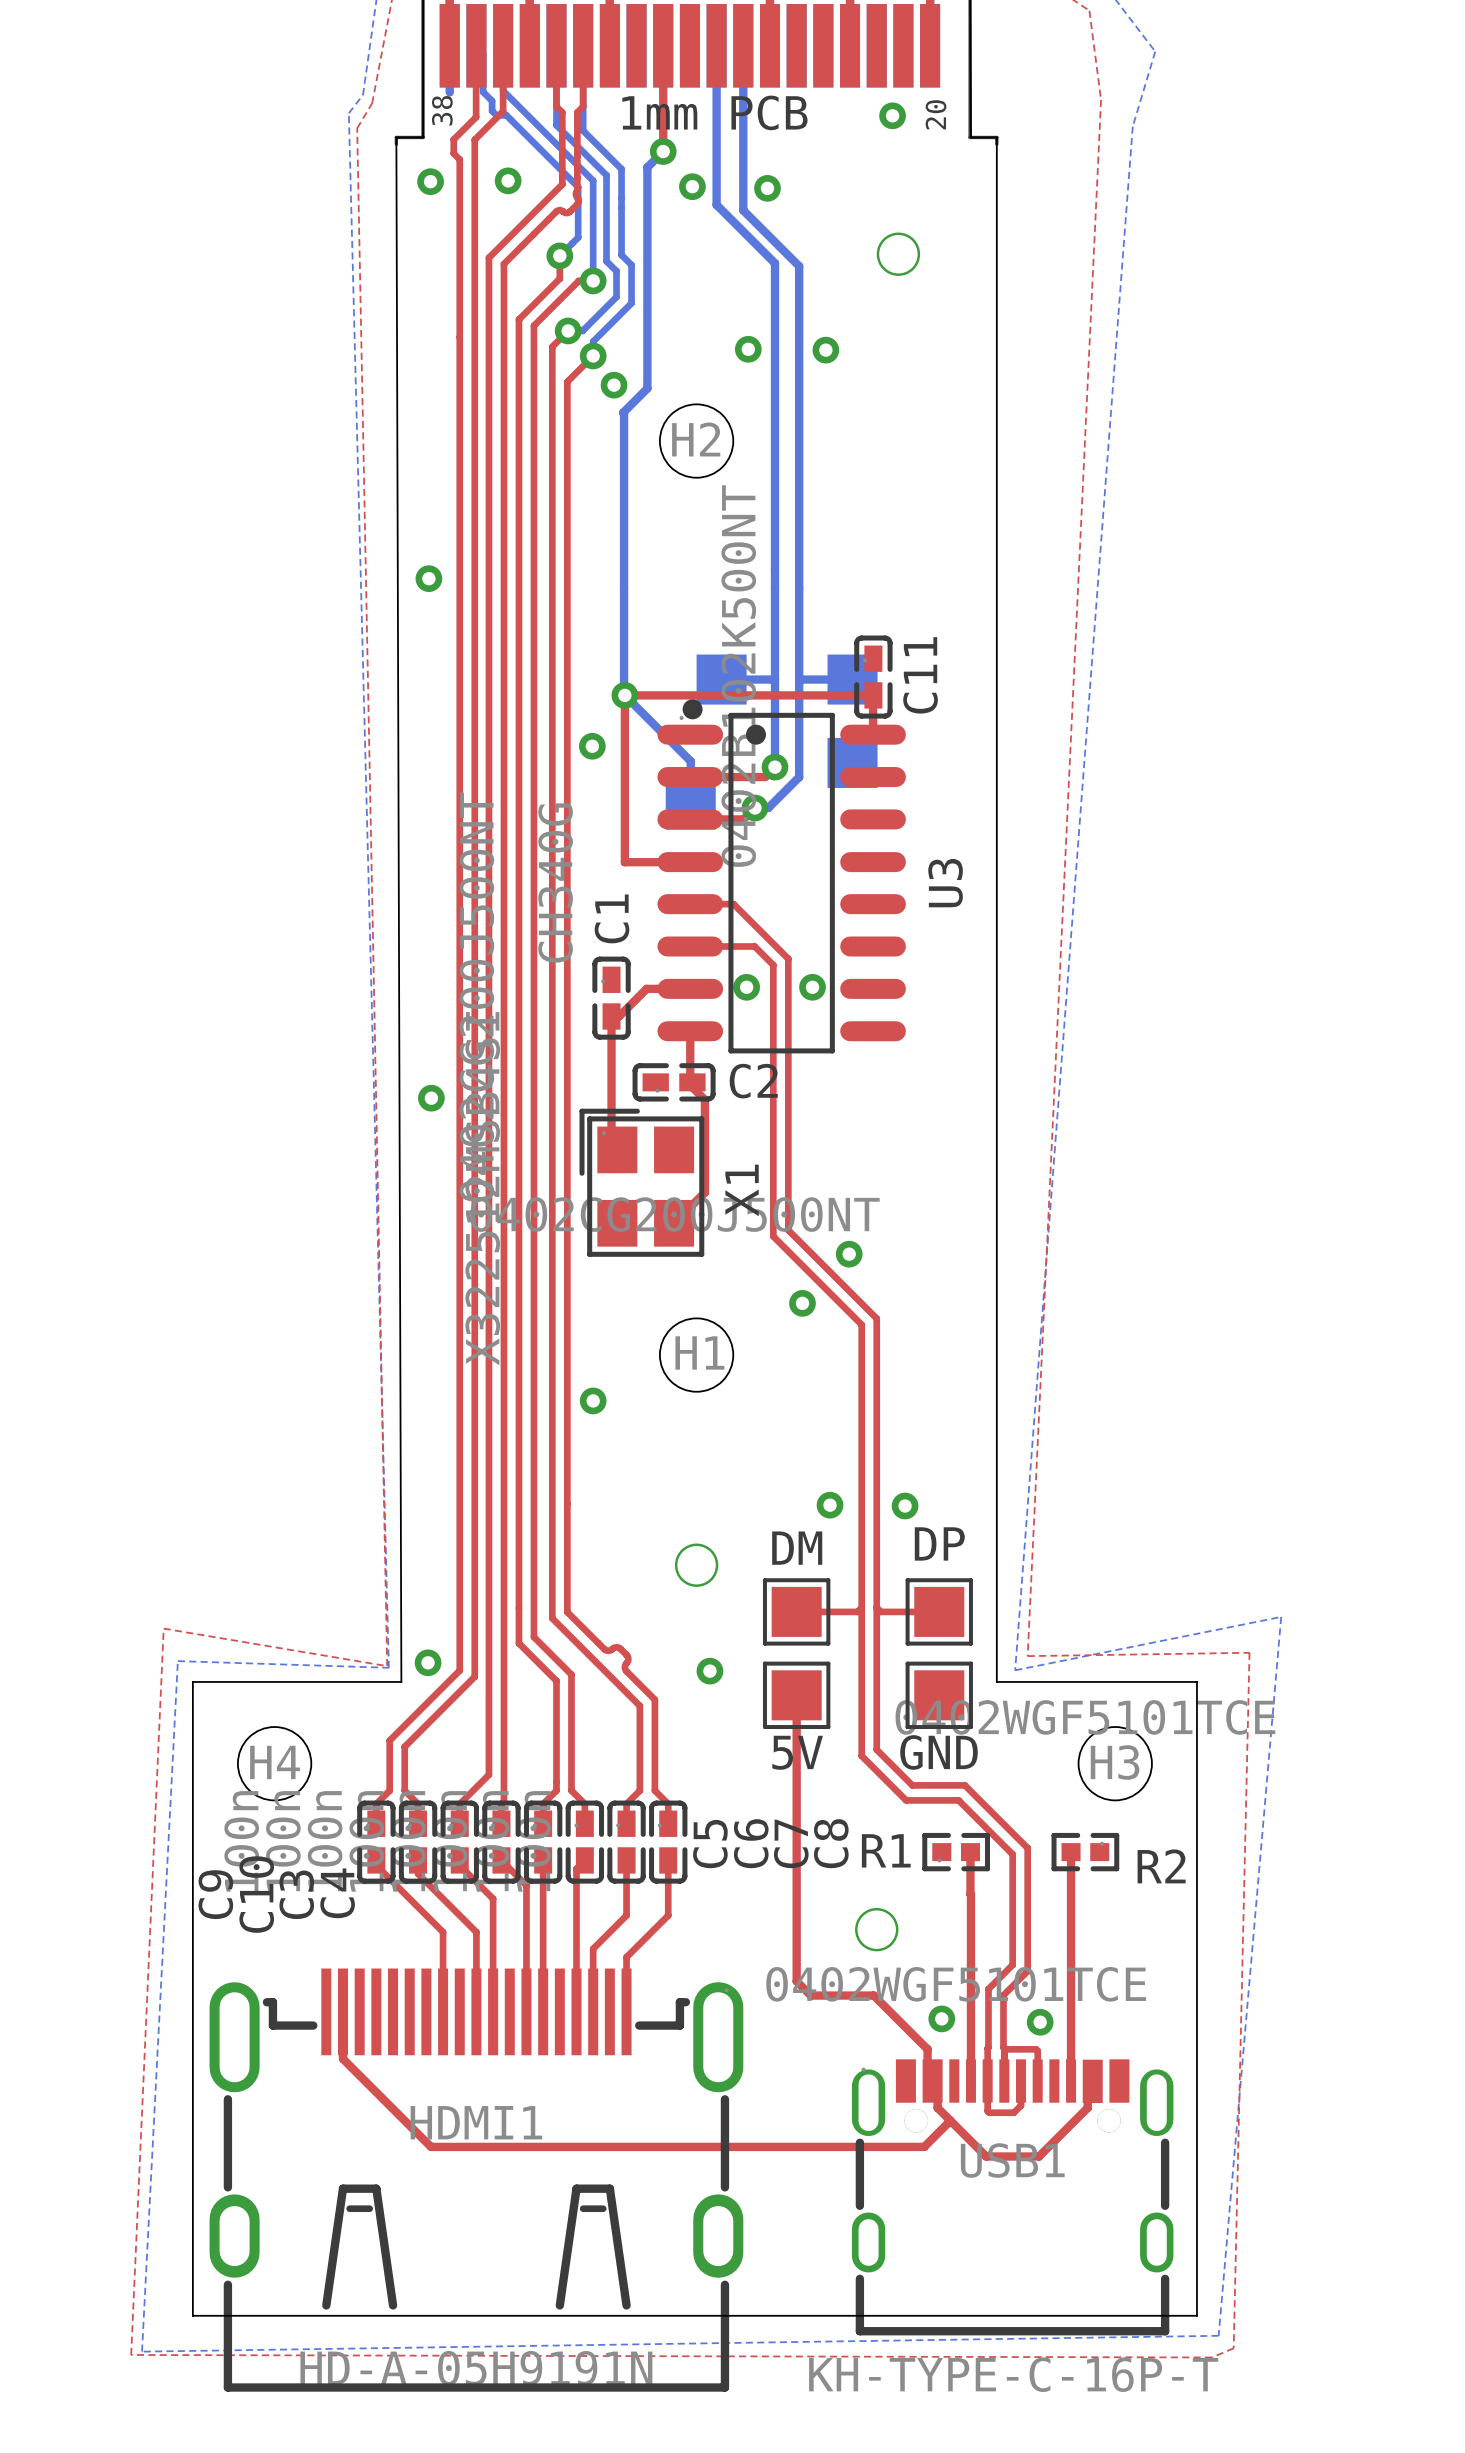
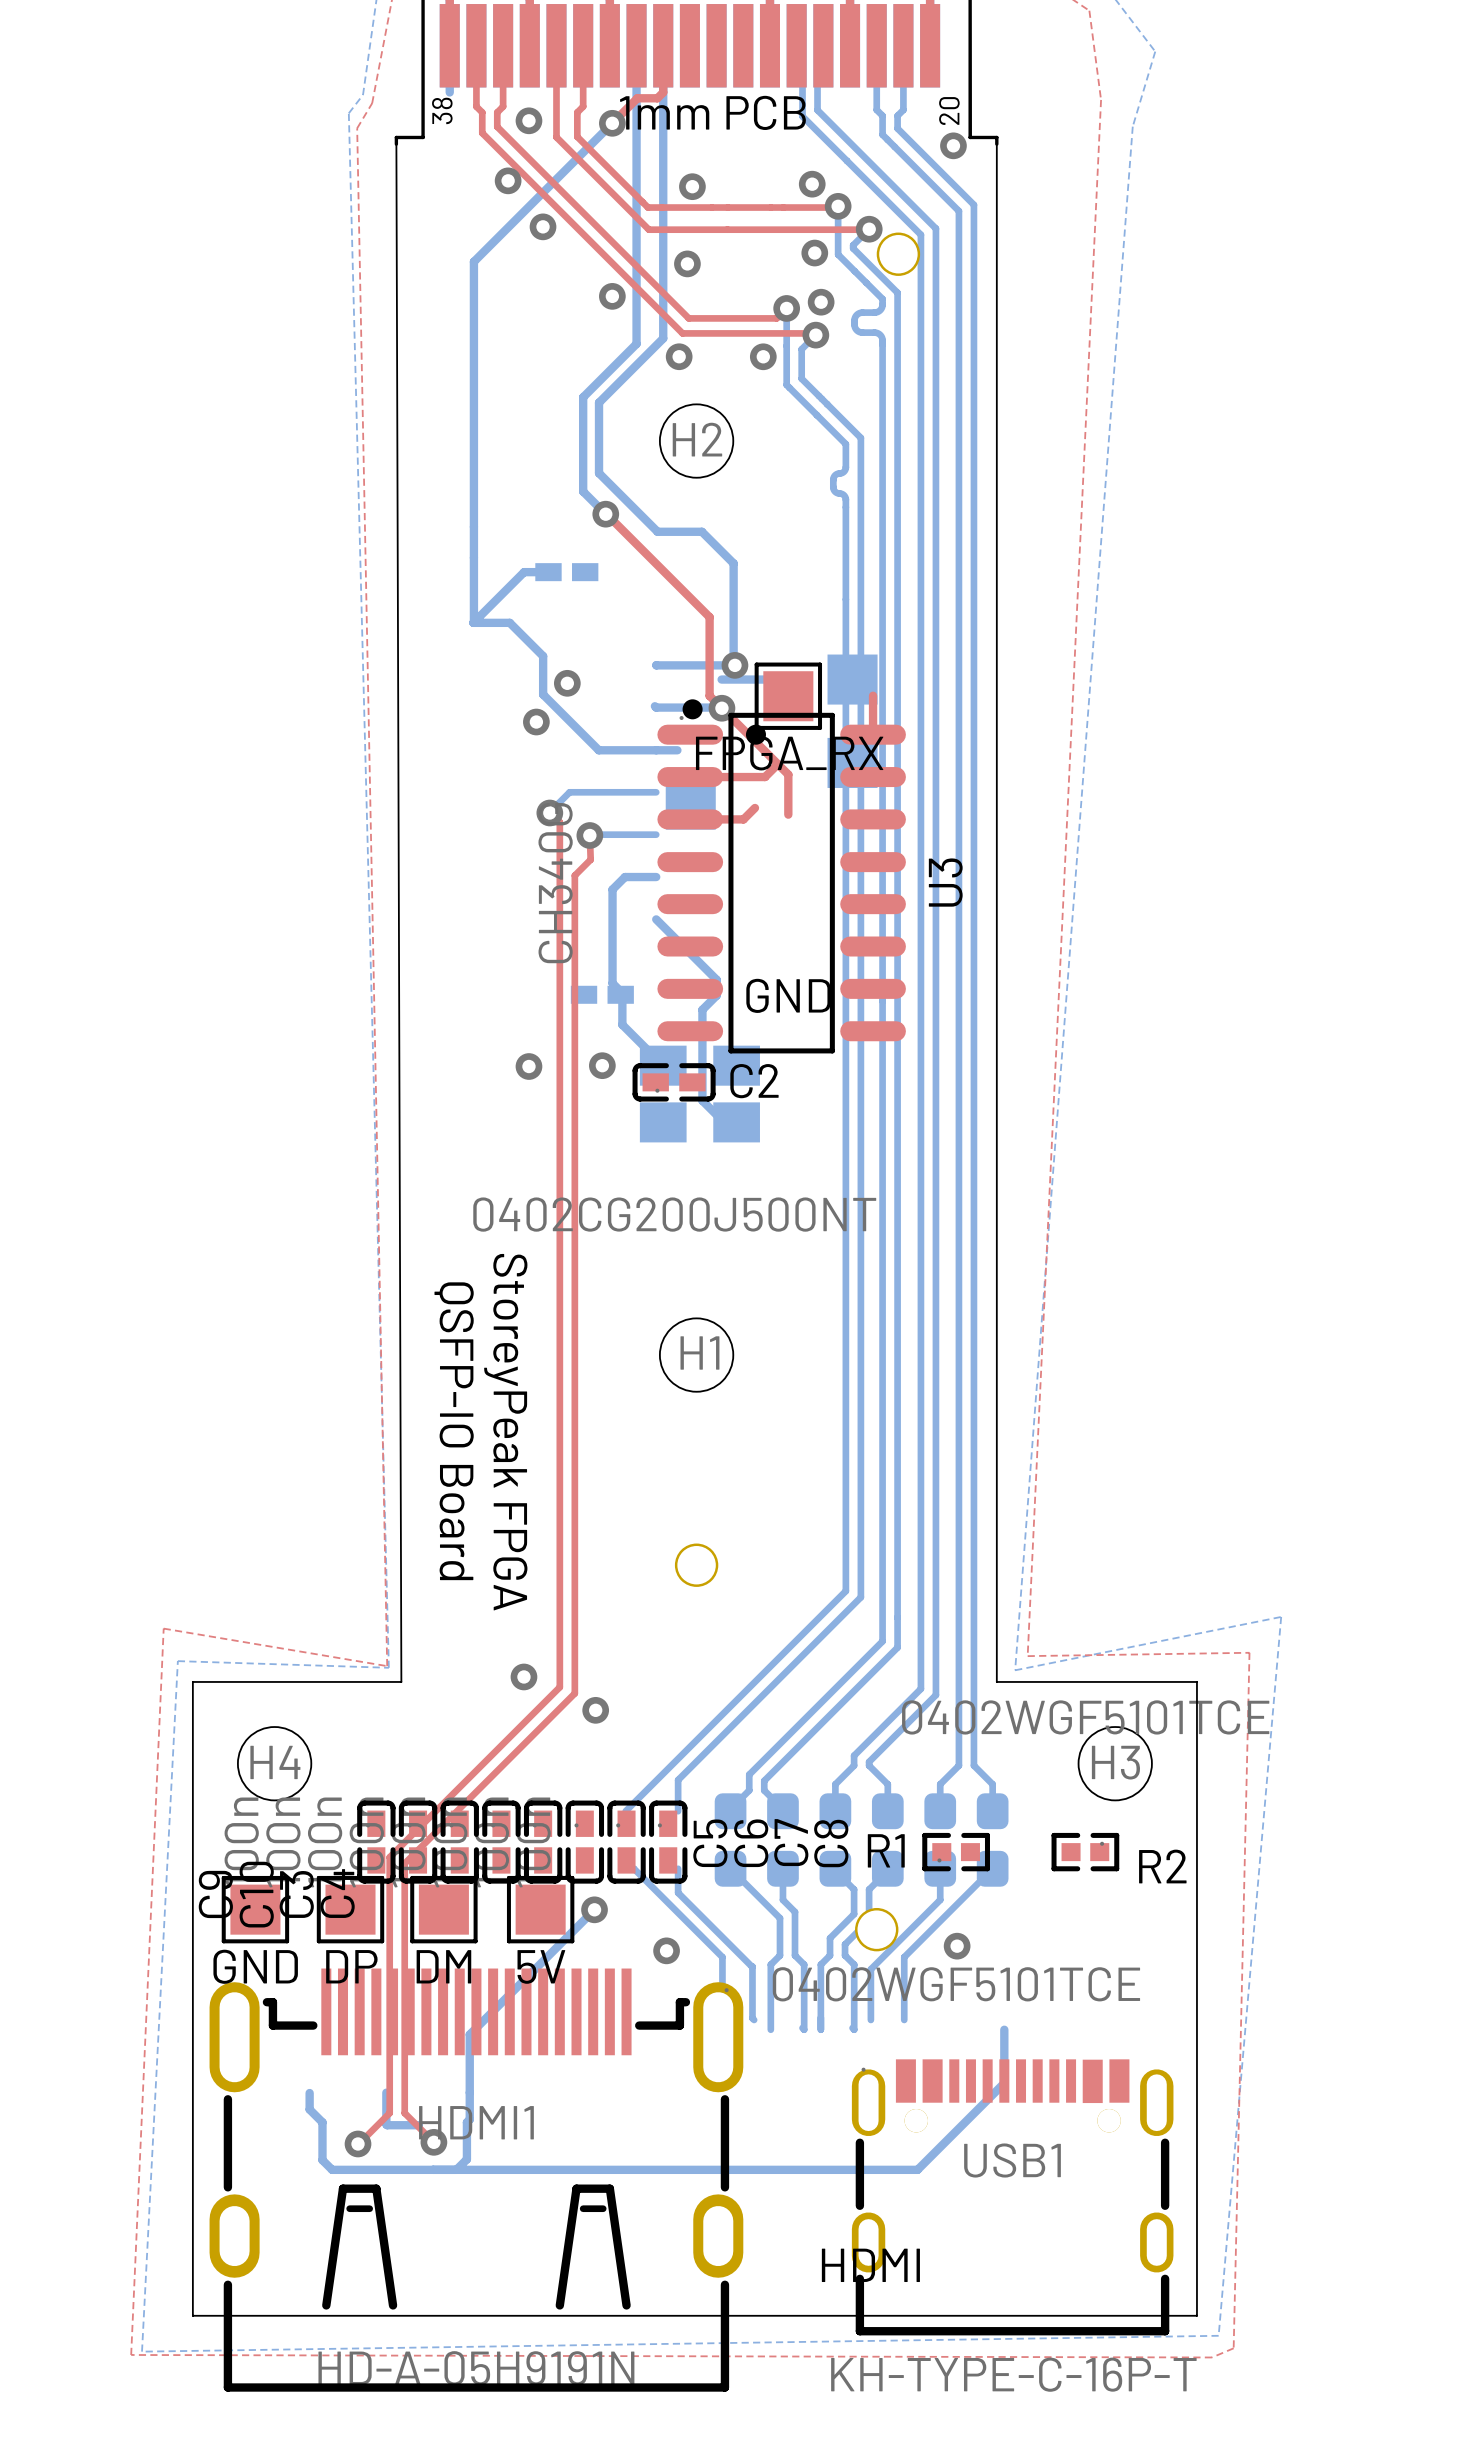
top track: (476, 44) (476, 117) (453, 139) (453, 153) (459, 159) (459, 1670) (389, 1740) (389, 1790) (376, 1803) (376, 1823) -> (476, 44) (476, 106) (482, 112) (482, 133) (682, 333) (814, 333) (815, 335)
bottom track: (476, 47) (483, 54) (483, 91) (492, 100) (492, 110) (496, 115) (506, 115) (578, 187) (578, 237) (559, 255) -> none
bottom track: (503, 47) (503, 90) (593, 180) (593, 280) -> none
bottom track: (556, 47) (556, 125) (606, 175) (606, 261) (616, 271) (616, 296) (582, 330) (568, 330) -> none
bottom track: (583, 47) (583, 130) (621, 169) (621, 255) (631, 265) (631, 303) (593, 341) (593, 355) -> none
bottom track: none -> (636, 47) (636, 343) (583, 397) (583, 491) (605, 514)
bottom track: none -> (663, 47) (663, 338) (599, 402) (599, 473) (657, 531) (701, 531) (733, 563) (734, 665) (656, 665)
bottom track: (716, 47) (716, 204) (774, 263) (774, 768) -> none
bottom track: (743, 47) (743, 210) (799, 266) (799, 777) (768, 807) (754, 807) -> none
bottom track: none -> (796, 47) (796, 79) (802, 84) (802, 116) (920, 234) (920, 1688) (854, 1755) (854, 1765) (835, 1784) (835, 1811)
bottom track: none -> (823, 47) (823, 79) (817, 84) (817, 110) (935, 228) (935, 1695) (869, 1761) (869, 1765) (887, 1784) (887, 1811)
bottom track: none -> (876, 47) (876, 109) (882, 115) (882, 134) (958, 211) (958, 1765) (940, 1784) (940, 1811)
bottom track: none -> (903, 47) (903, 109) (897, 115) (897, 128) (973, 204) (973, 1765) (992, 1784) (992, 1811)
top track: (663, 92) (663, 151) -> (663, 92) (657, 98) (637, 98) (612, 123)
top track: (503, 106) (503, 111) (474, 139) (474, 1676) (404, 1746) (404, 1790) (418, 1803) (418, 1823) -> (503, 106) (497, 112) (497, 126) (688, 318) (776, 318) (786, 308)
top track: (556, 106) (562, 112) (562, 184) (488, 257) (488, 1774) (459, 1803) (459, 1823) -> (556, 106) (556, 137) (648, 229) (858, 229)
part text position: 20 (936, 114) -> 20 (949, 110)
via: (892, 115) -> none
via: none -> (528, 120)
bottom track: none -> (612, 123) (473, 261) (473, 622)
via: none -> (612, 123)
top track: (577, 136) (575, 194) (578, 203) (568, 212) (556, 211) (503, 264) (503, 1801) (501, 1803) (501, 1823) -> (577, 136) (648, 207) (838, 206)
via: none -> (953, 145)
bottom track: (663, 151) (647, 167) (647, 388) (623, 412) (624, 694) (690, 761) (690, 804) -> none
via: (663, 151) -> none
via: (430, 181) -> none
via: none -> (812, 184)
via: (767, 188) -> none
bottom track: none -> (838, 206) (838, 254) (882, 299) (882, 306) (879, 310) (859, 313) (854, 320) (857, 330) (877, 333) (882, 340) (882, 1641) (749, 1774) (749, 1790) (730, 1811)
via: none -> (838, 206)
via: none -> (543, 226)
bottom track: none -> (869, 229) (853, 245) (853, 248) (897, 292) (897, 1647) (764, 1780) (764, 1790) (782, 1811)
via: none -> (869, 229)
via: none -> (814, 253)
top track: (559, 255) (559, 278) (518, 319) (518, 1643) (556, 1680) (556, 1790) (543, 1803) (543, 1823) -> none
via: (559, 255) -> none
via: none -> (687, 263)
top track: (593, 280) (578, 280) (533, 325) (533, 1637) (571, 1674) (571, 1790) (584, 1803) (584, 1823) -> none
via position: (593, 280) -> (612, 296)
via: none -> (821, 302)
bottom track: none -> (786, 308) (786, 384) (845, 444) (845, 469) (842, 472) (835, 474) (833, 479) (834, 490) (843, 494) (845, 499) (845, 1591) (625, 1811)
via: none -> (786, 308)
top track: (568, 330) (552, 346) (552, 1618) (639, 1705) (639, 1790) (626, 1803) (626, 1823) -> none
via: (568, 330) -> none
bottom track: none -> (815, 335) (801, 349) (801, 378) (860, 437) (860, 1597) (678, 1780) (678, 1811)
via position: (748, 349) -> (763, 356)
via position: (825, 350) -> (815, 335)
top track: (593, 355) (567, 381) (567, 1612) (605, 1649) (609, 1650) (616, 1647) (620, 1649) (628, 1657) (625, 1666) (625, 1670) (654, 1699) (654, 1790) (668, 1803) (668, 1823) -> none
via: (593, 355) -> none
via: none -> (679, 356)
via: (614, 385) -> none
top track: none -> (605, 514) (709, 617) (709, 695) (788, 774) (788, 814)
via: none -> (605, 514)
bottom track: none -> (548, 572) (524, 572) (473, 622) (509, 622) (543, 656) (543, 694) (598, 750) (677, 750)
via: (428, 578) -> none
via: none -> (734, 665)
C11 side: top (873, 677) -> bottom (566, 572)
part side: bottom (721, 679) -> top (788, 696)
bottom track: (799, 679) (852, 679) -> none
via: none -> (567, 683)
via: (624, 695) -> none
top track: (873, 695) (624, 695) (624, 862) (690, 862) -> none
bottom track: none -> (654, 706) (721, 708)
via: none -> (721, 708)
via: none -> (536, 722)
via: (592, 746) -> none
via: (774, 767) -> none
bottom track: none -> (656, 792) (569, 792) (549, 812)
via: (754, 807) -> none
top track: none -> (549, 812) (559, 822) (559, 1687) (389, 1857) (389, 2113) (358, 2144)
via: none -> (549, 812)
top track: none -> (590, 834) (590, 859) (574, 875) (574, 1693) (404, 1863) (404, 2113) (435, 2143)
bottom track: none -> (590, 834) (656, 834)
via: none -> (589, 835)
bottom track: none -> (656, 877) (625, 877) (612, 889) (612, 983) (622, 993)
top track: (690, 904) (733, 904) (788, 958) (788, 1230) (876, 1318) (876, 1749) (912, 1785) (964, 1785) (1027, 1848) (1027, 1971) (1003, 1995) (1004, 2081) -> none
bottom track: none -> (656, 919) (716, 979) (716, 995) (702, 1009) (702, 1100) (724, 1122) (739, 1122)
top track: (690, 946) (754, 946) (773, 965) (773, 1236) (861, 1324) (861, 1755) (906, 1800) (958, 1800) (1012, 1854) (1012, 1964) (988, 1989) (987, 2111) (989, 2112) (1013, 2112) (1021, 2105) (1021, 2081) -> none
via: (746, 987) -> none
via: (812, 987) -> none
top track: (690, 988) (646, 988) (619, 1016) (611, 1016) (611, 1144) (617, 1149) -> none
bottom track: none -> (622, 993) (622, 1024) (663, 1065)
text: none -> GND (788, 995)
C1 side: top (611, 998) -> bottom (602, 994)
top track: (690, 1031) (690, 1080) (692, 1087) (704, 1099) (704, 1192) (674, 1223) -> none
via: none -> (602, 1065)
via: none -> (528, 1066)
via: (431, 1098) -> none
X1 side: top (641, 1182) -> bottom (699, 1094)
via: (849, 1254) -> none
via: (802, 1303) -> none
via: (593, 1400) -> none
text: none -> QSFP-IO Board (454, 1431)
text: none -> StoreyPeak FPGA (505, 1432)
via: (830, 1505) -> none
via: (905, 1506) -> none
part value position: DP (939, 1543) -> DP (351, 1966)
part value position: DM (797, 1548) -> DM (443, 1966)
top track: (861, 1607) (857, 1611) (796, 1611) -> none
top track: (876, 1607) (880, 1611) (939, 1611) -> none
part position: (796, 1611) -> (443, 1909)
part position: (939, 1611) -> (350, 1909)
via: (428, 1662) -> none
via: (709, 1671) -> none
via: none -> (523, 1676)
top track: (796, 1695) (796, 1981) (810, 1995) (873, 1995) (927, 2049) (927, 2081) -> none
part position: (796, 1695) -> (540, 1909)
part position: (939, 1695) -> (255, 1909)
via: none -> (595, 1710)
part: none -> (730, 1840)
part: none -> (782, 1840)
part: none -> (835, 1840)
part: none -> (887, 1840)
part: none -> (940, 1840)
part: none -> (992, 1840)
top track: (970, 1852) (970, 2081) -> none
top track: (1071, 1852) (1071, 2081) -> none
top track: (376, 1860) (376, 1865) (443, 1932) (443, 2011) -> none
top track: (418, 1860) (418, 1873) (476, 1932) (476, 2011) -> none
top track: (459, 1860) (459, 1865) (493, 1898) (493, 2011) -> none
top track: (501, 1860) (526, 1885) (526, 2011) -> none
top track: (543, 1860) (543, 2011) -> none
top track: (584, 1860) (576, 1868) (576, 2011) -> none
top track: (626, 1860) (626, 1915) (593, 1948) (593, 2011) -> none
top track: (668, 1860) (668, 1915) (626, 1957) (626, 2011) -> none
bottom track: none -> (625, 1868) (634, 1868) (722, 1957) (722, 2018) (720, 2019)
bottom track: none -> (678, 1868) (678, 1892) (751, 1966)
bottom track: none -> (730, 1868) (779, 1918) (779, 1955) (770, 1964) (770, 2029)
bottom track: none -> (782, 1868) (782, 1899) (795, 1912) (795, 1955) (804, 1964) (804, 2029) (802, 2028)
bottom track: none -> (835, 1868) (854, 1889) (854, 1914) (830, 1938) (830, 1955) (820, 1964) (820, 2029)
bottom track: none -> (887, 1868) (869, 1889) (869, 1920) (845, 1944) (845, 1955) (854, 1964) (854, 2029) (852, 2028)
bottom track: none -> (940, 1868) (940, 1899) (870, 1969) (870, 2019)
bottom track: none -> (992, 1868) (904, 1957) (904, 2019)
bottom track: none -> (594, 1909) (469, 2034) (469, 2119) (466, 2122) (466, 2159) (456, 2169)
via: none -> (594, 1909)
via: none -> (957, 1946)
via: none -> (666, 1950)
bottom track: none -> (752, 1966) (752, 2018) (754, 2019)
top track: (343, 2011) (343, 2058) (430, 2146) (924, 2146) (950, 2120) -> none
via: (941, 2018) -> none
via: (1040, 2022) -> none
bottom track: none -> (1004, 2029) (1004, 2083) (917, 2169) (332, 2169) (322, 2160) (322, 2122) (309, 2109) (309, 2093)
top track: (1004, 2051) (1005, 2049) (1036, 2049) (1037, 2051) (1037, 2081) -> none
top track: (937, 2081) (937, 2107) (986, 2156) (1039, 2156) (1087, 2107) (1087, 2081) -> none
bottom track: none -> (386, 2092) (386, 2124) (418, 2125)
via: none -> (433, 2142)
via: none -> (358, 2143)
text: none -> HDMI (870, 2265)

